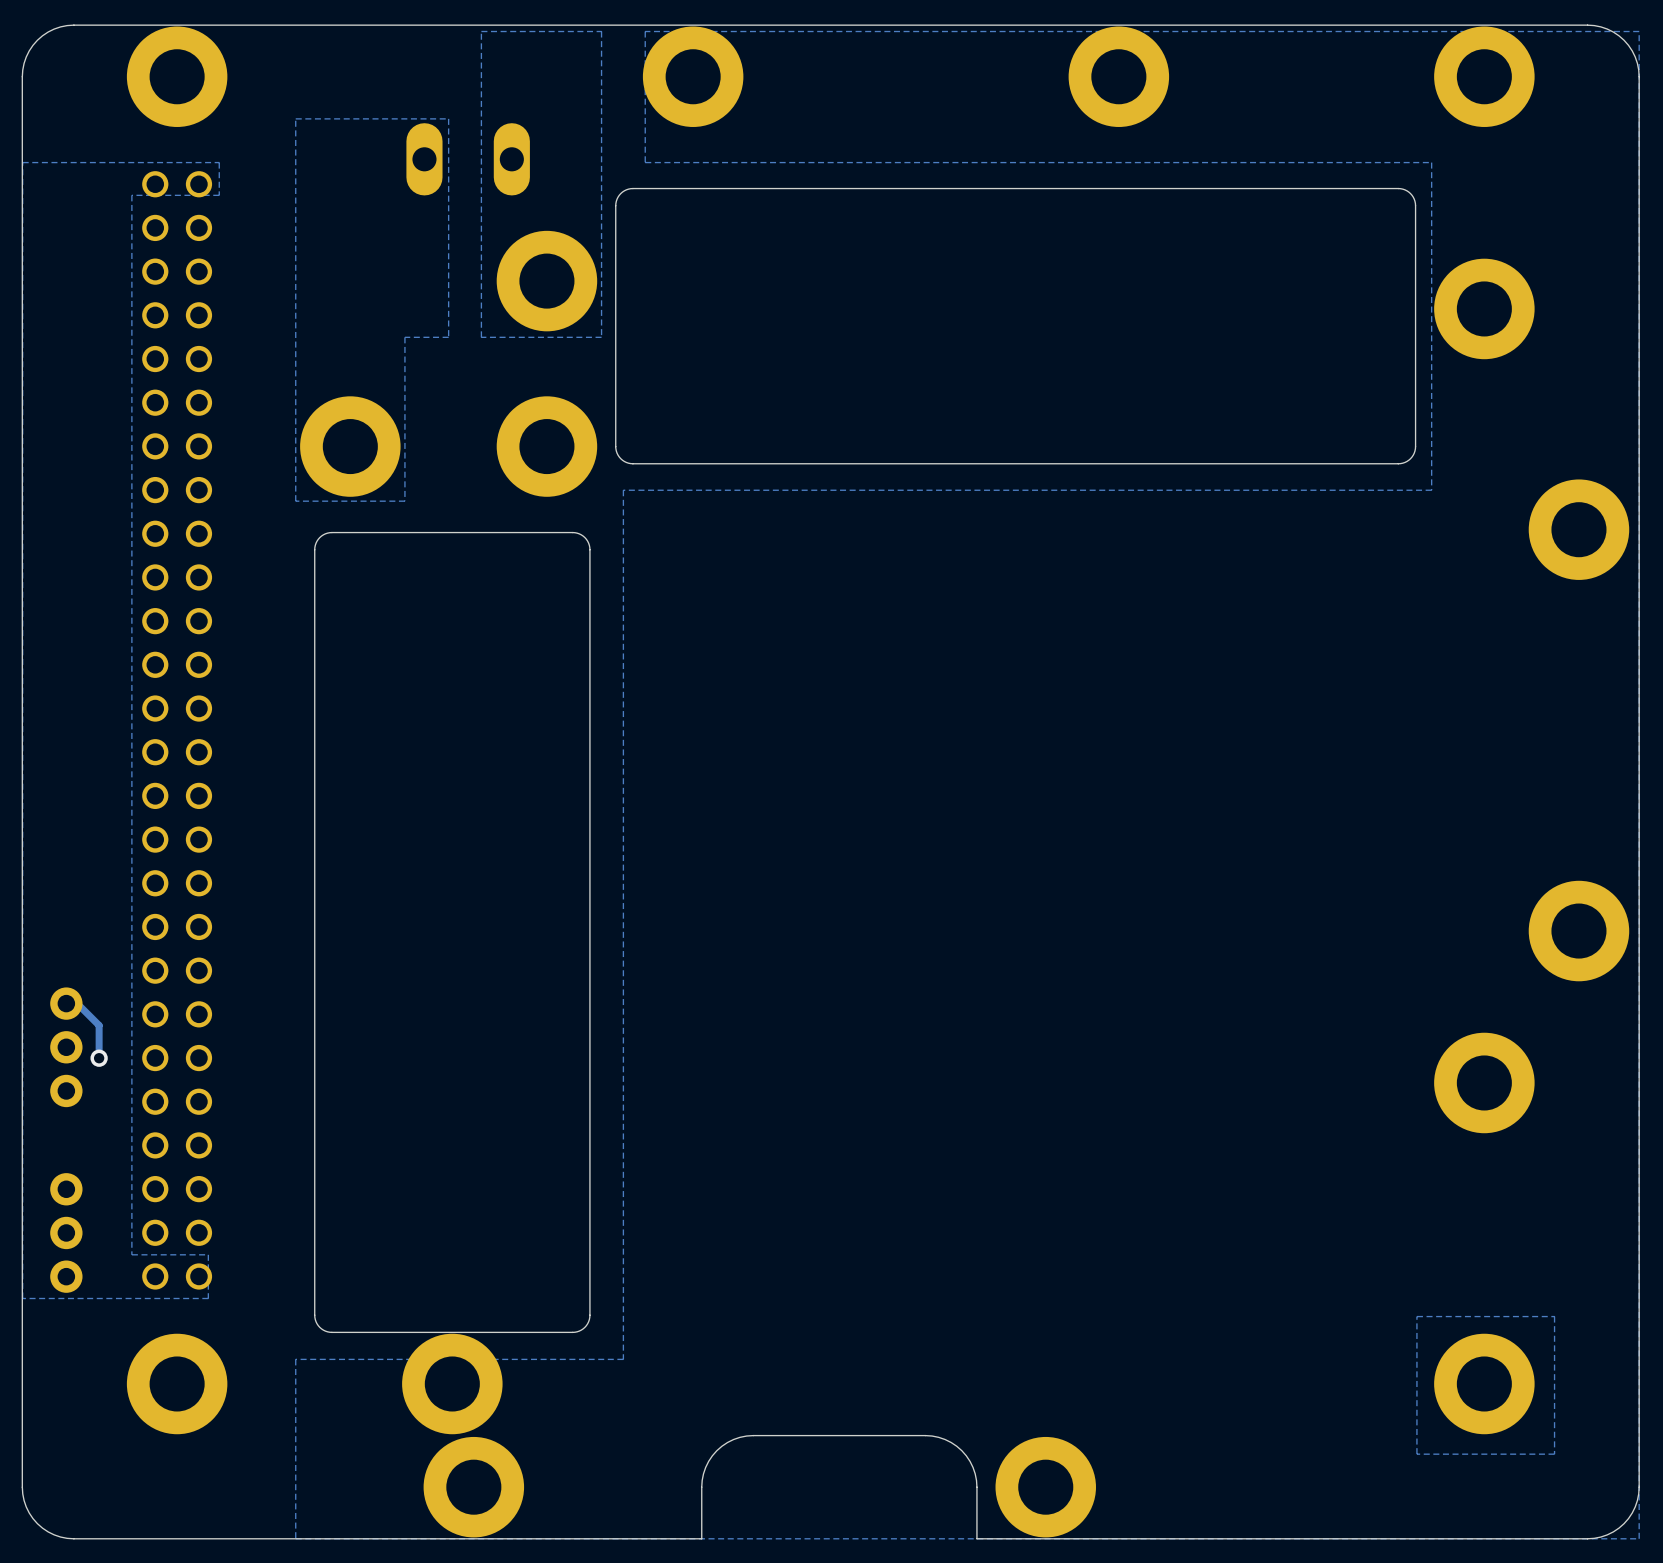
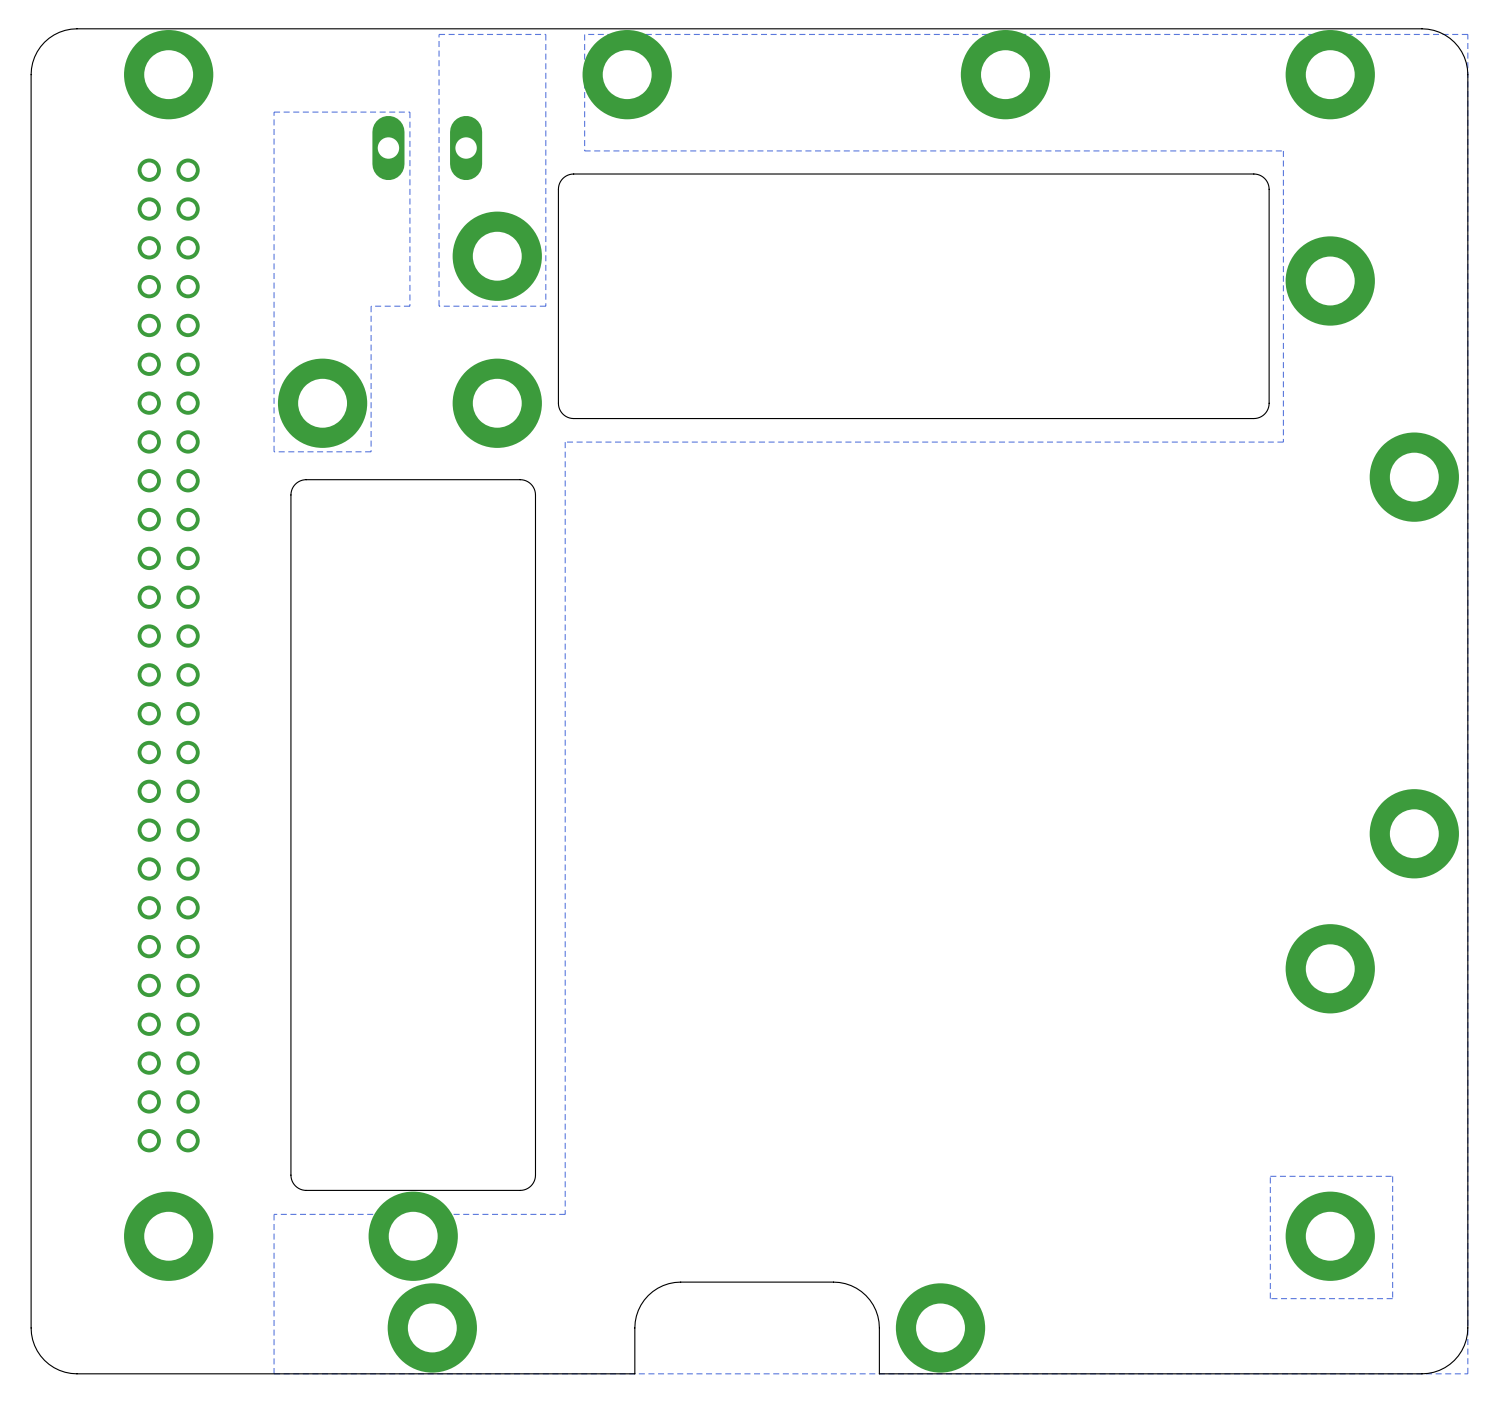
zone outline: (219, 162) (22, 162) (22, 1298) (208, 1298) (208, 1254) (131, 1254) (131, 195) (219, 195) (219, 162) -> none
track: (66, 1003) (77, 1003) (99, 1025) (99, 1058) -> none
part: (66, 1047) -> none
via: (99, 1058) -> none
part: (66, 1232) -> none

